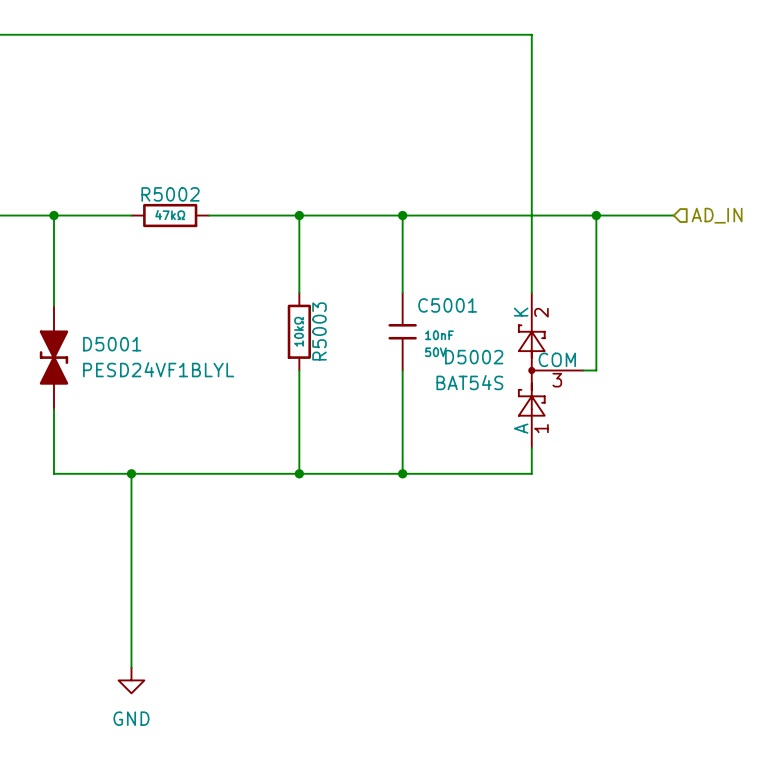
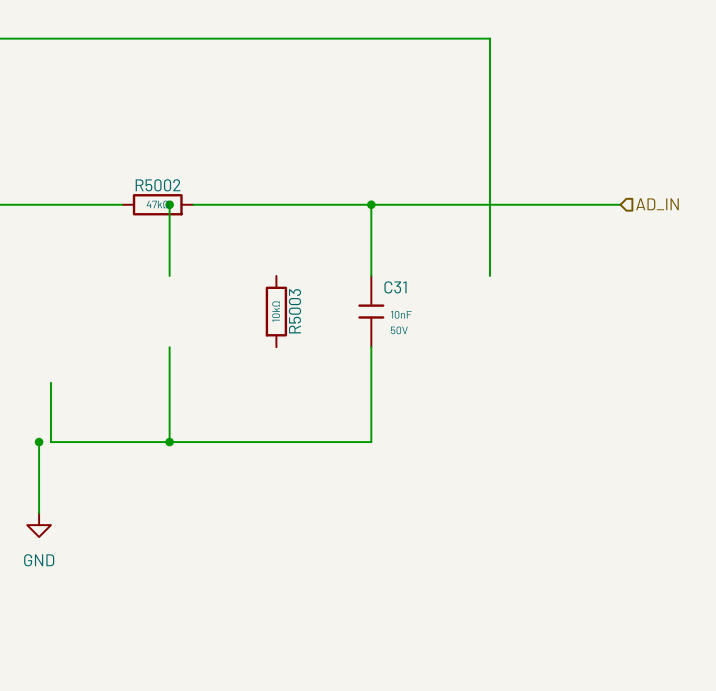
wire: (53, 215) (53, 305) -> none
junction: (53, 215) -> none
junction: none -> (169, 204)
wire: (299, 215) (299, 293) -> (169, 204) (169, 275)
junction: (299, 215) -> none
wire: (596, 215) (596, 370) (583, 370) -> none
junction: (596, 215) -> none
C5001 name: C5001 (447, 305) -> C31 (395, 287)
D5001: PESD24VF1BLYL (53, 357) -> none
wire: (299, 370) (299, 473) -> (169, 347) (169, 442)
D5002: BAT54S (551, 370) -> none
wire: (531, 447) (531, 473) (402, 473) -> none
wire: none -> (39, 442) (39, 513)
junction: none -> (39, 442)
wire: (131, 473) (131, 667) -> none
junction: (131, 473) -> none
junction: none -> (169, 442)
junction: (299, 473) -> none
junction: (402, 473) -> none
power symbol position: GND (131, 680) -> GND (39, 525)

